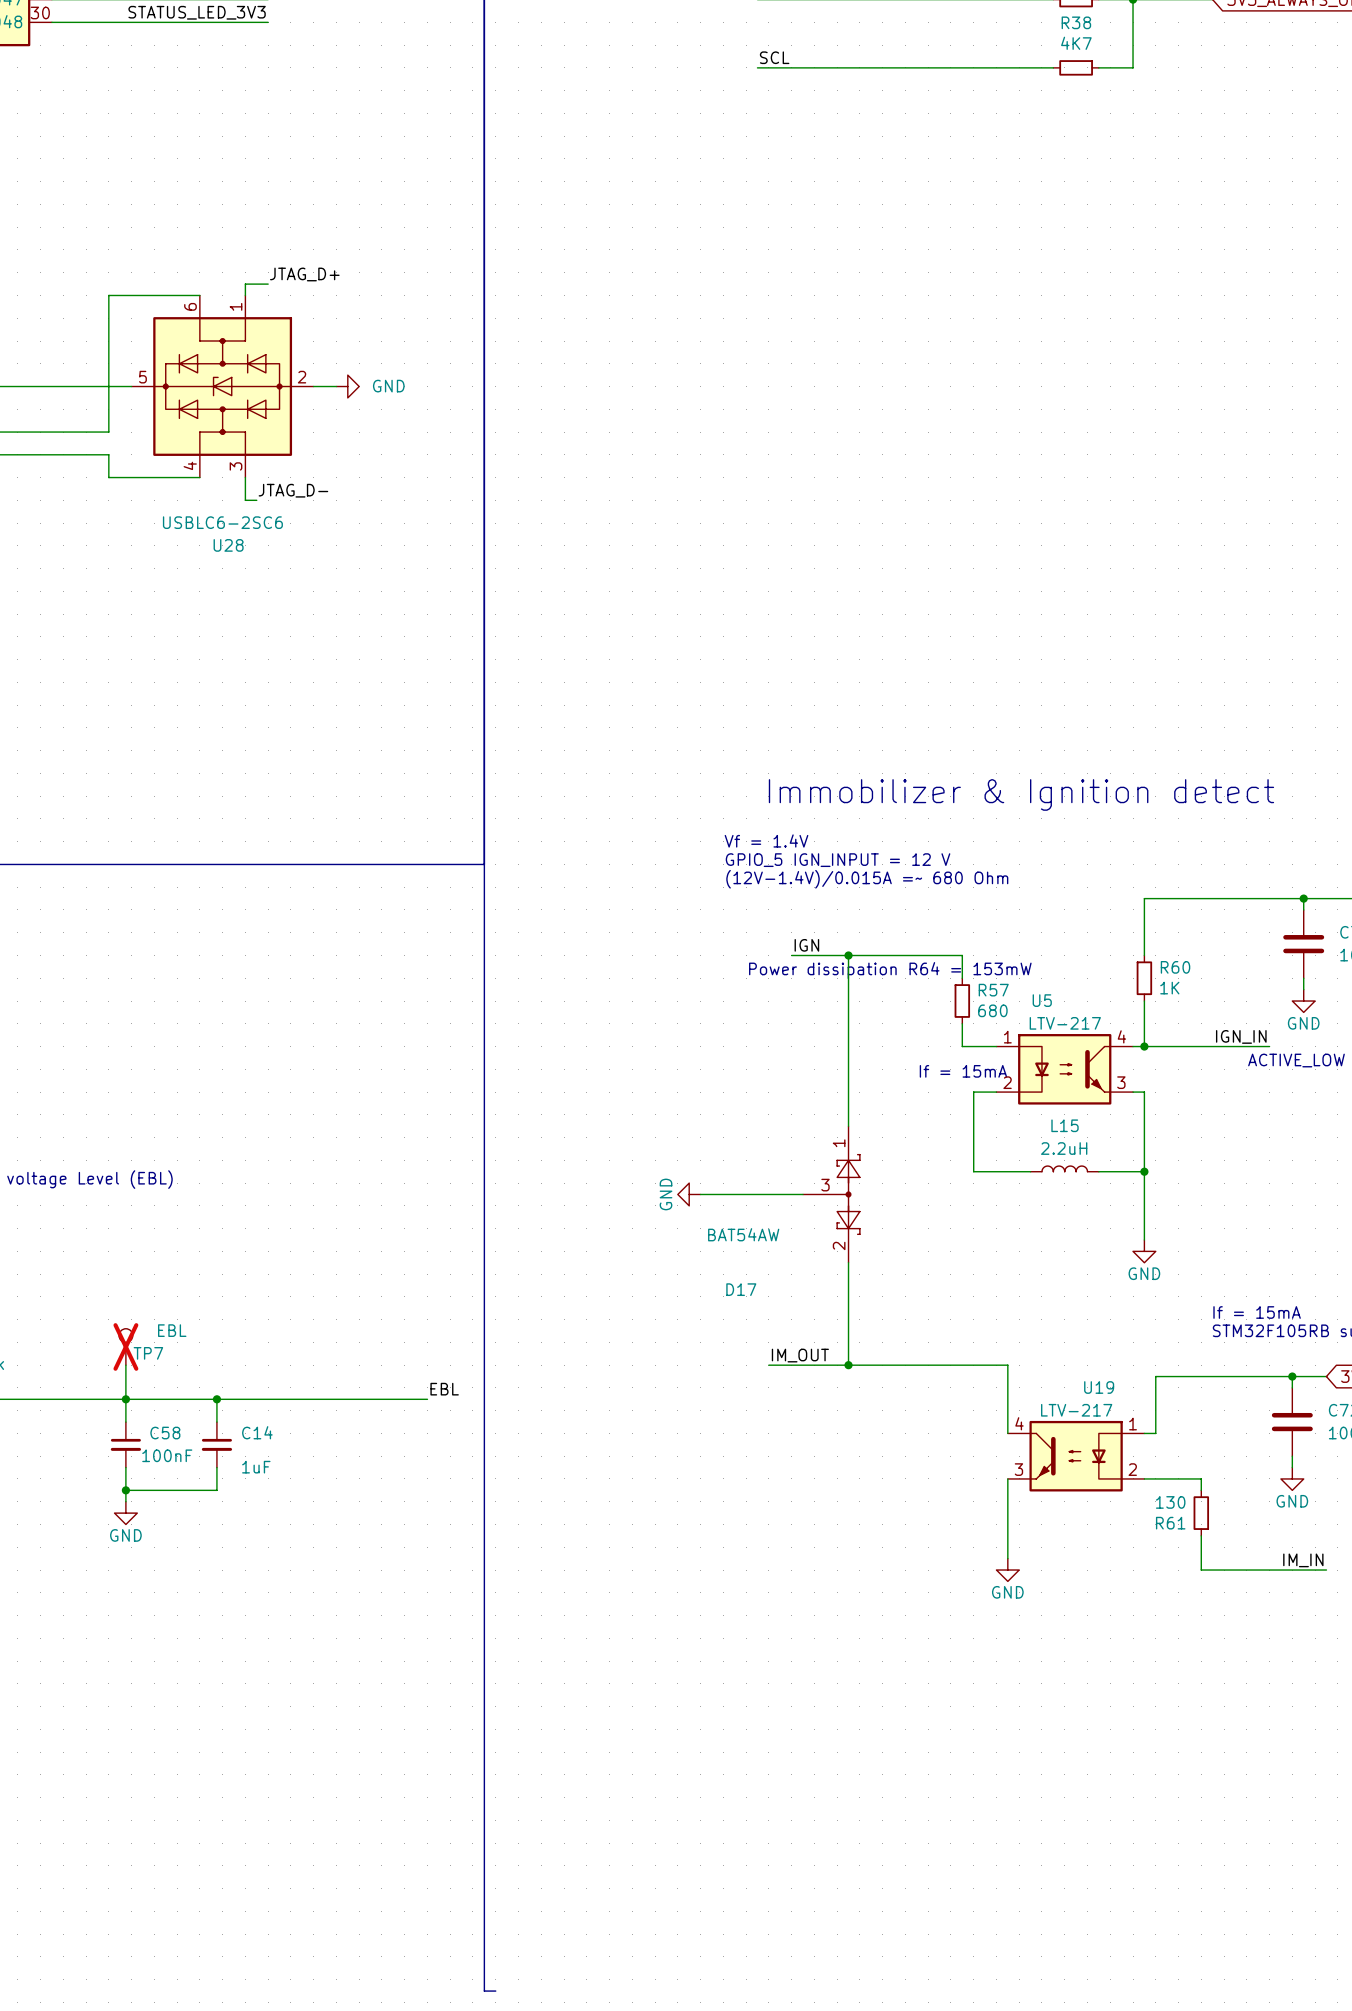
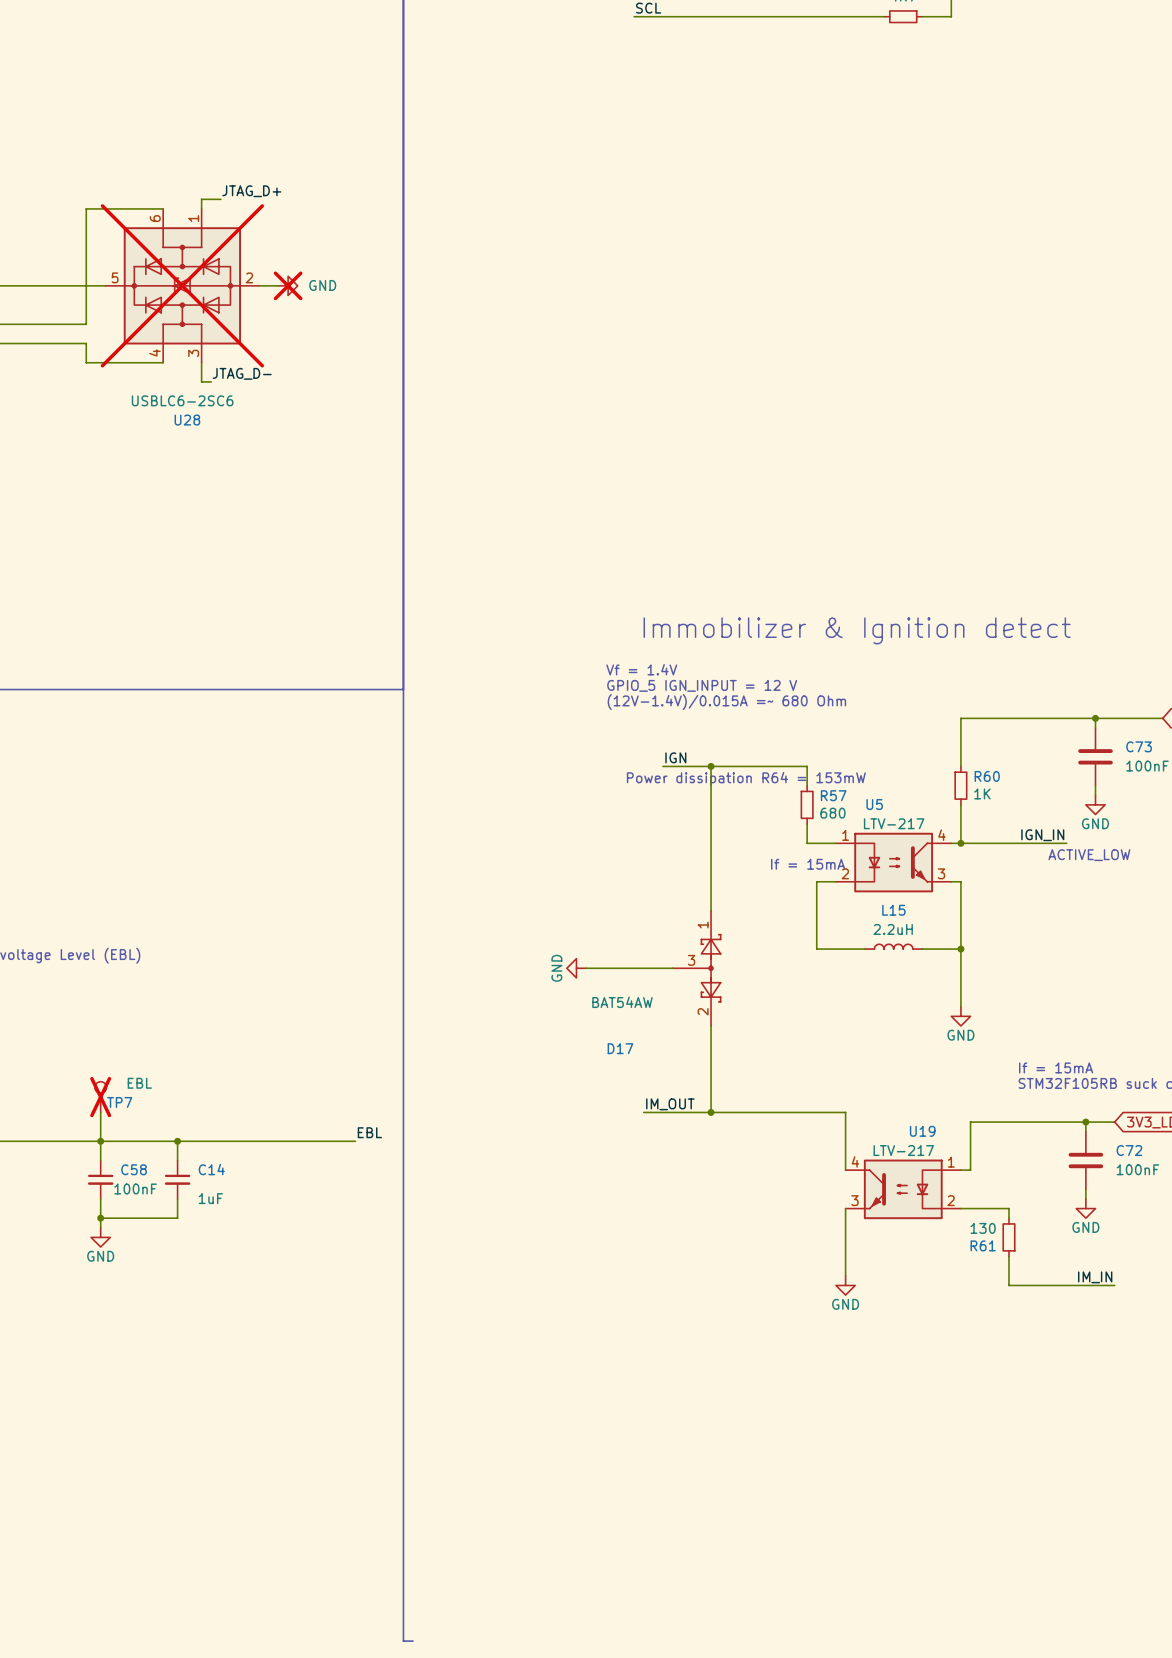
U28 do-not-place cross: none -> (182, 285)
power symbol do-not-place cross: none -> (288, 285)

